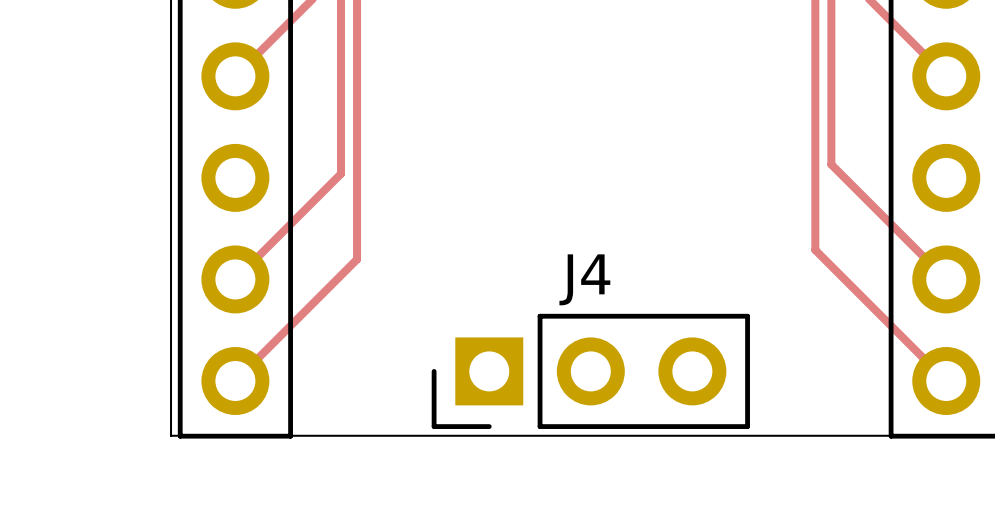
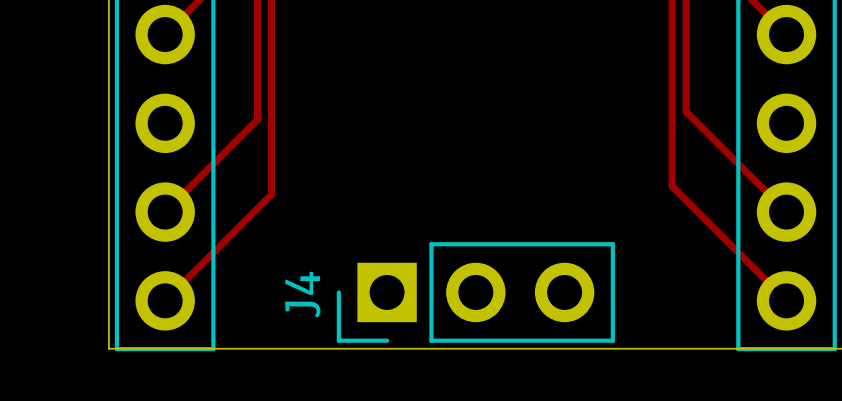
J4 name rotation: 0° (584, 279) -> 90° counterclockwise (302, 294)
J4 name position: J4 (584, 279) -> J4 (302, 294)

